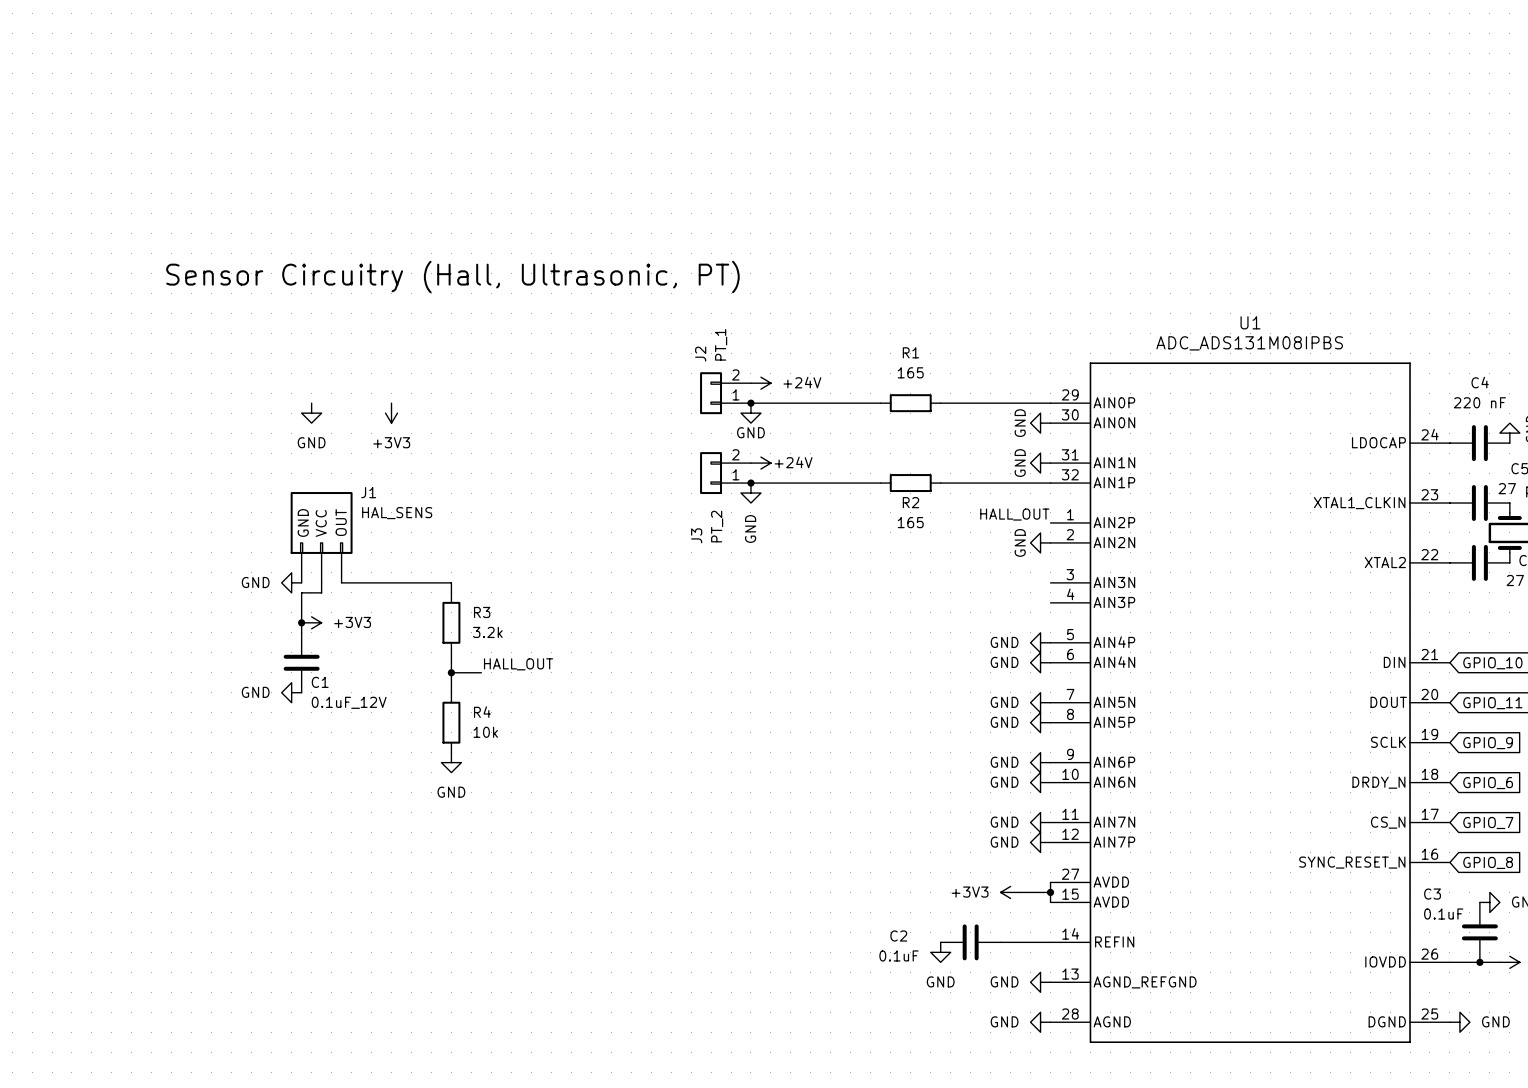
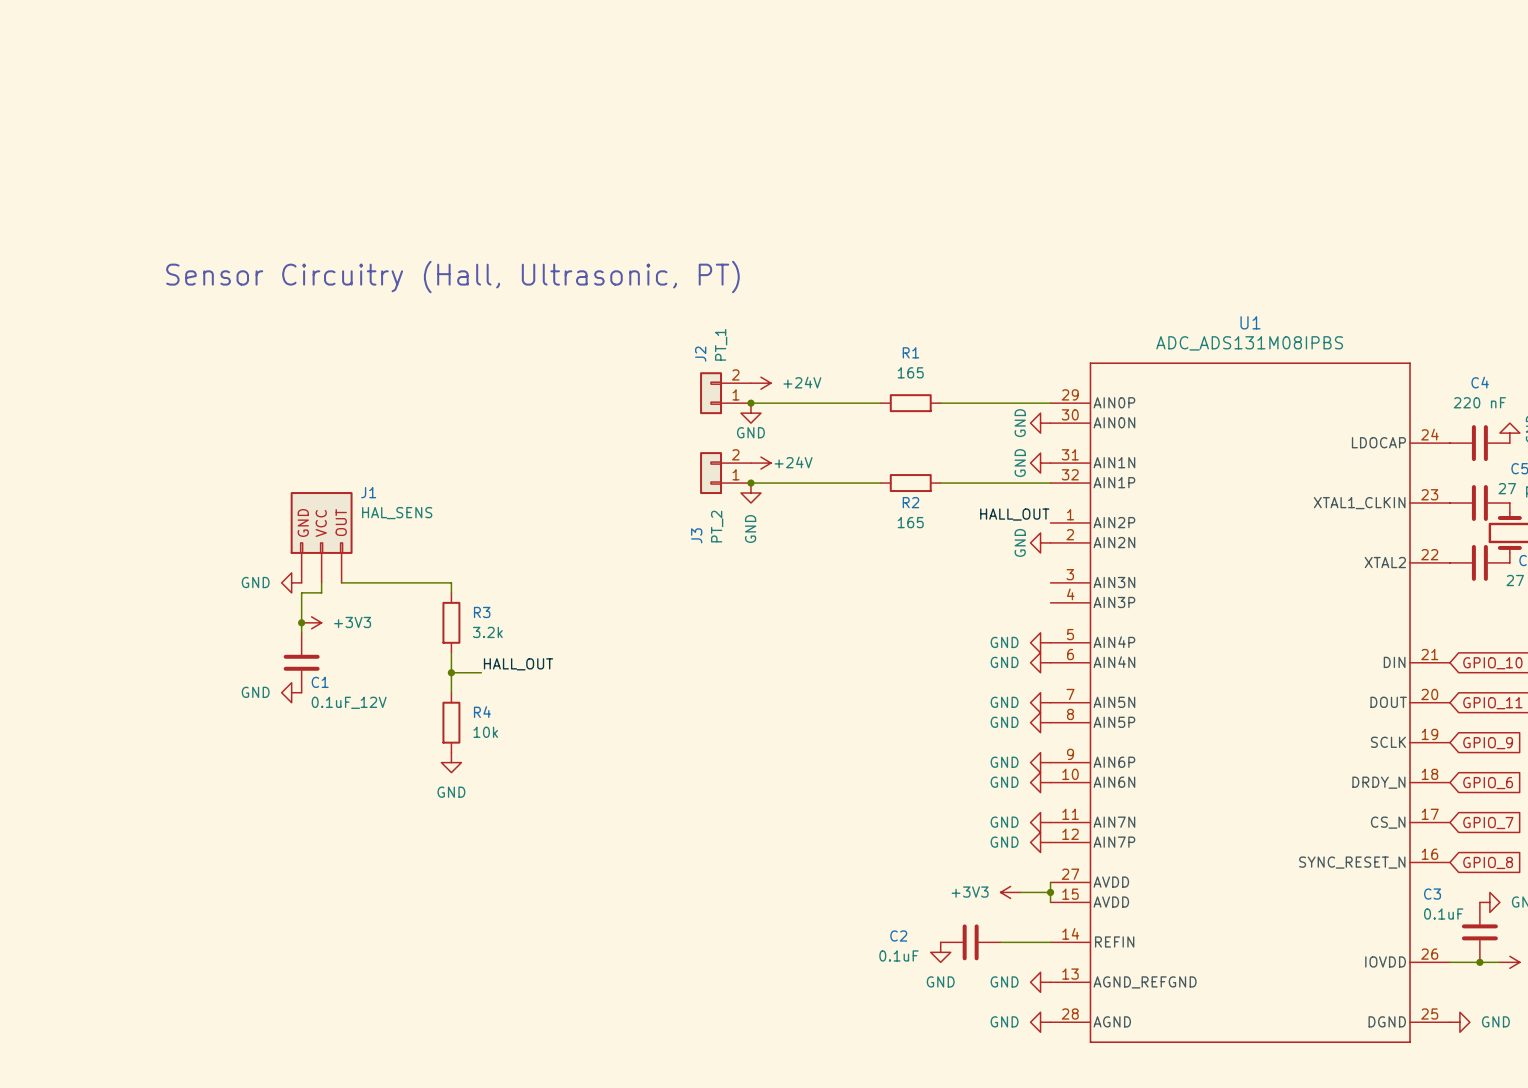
power symbol: GND (311, 413) -> none
power symbol: +3V3 (391, 413) -> none

